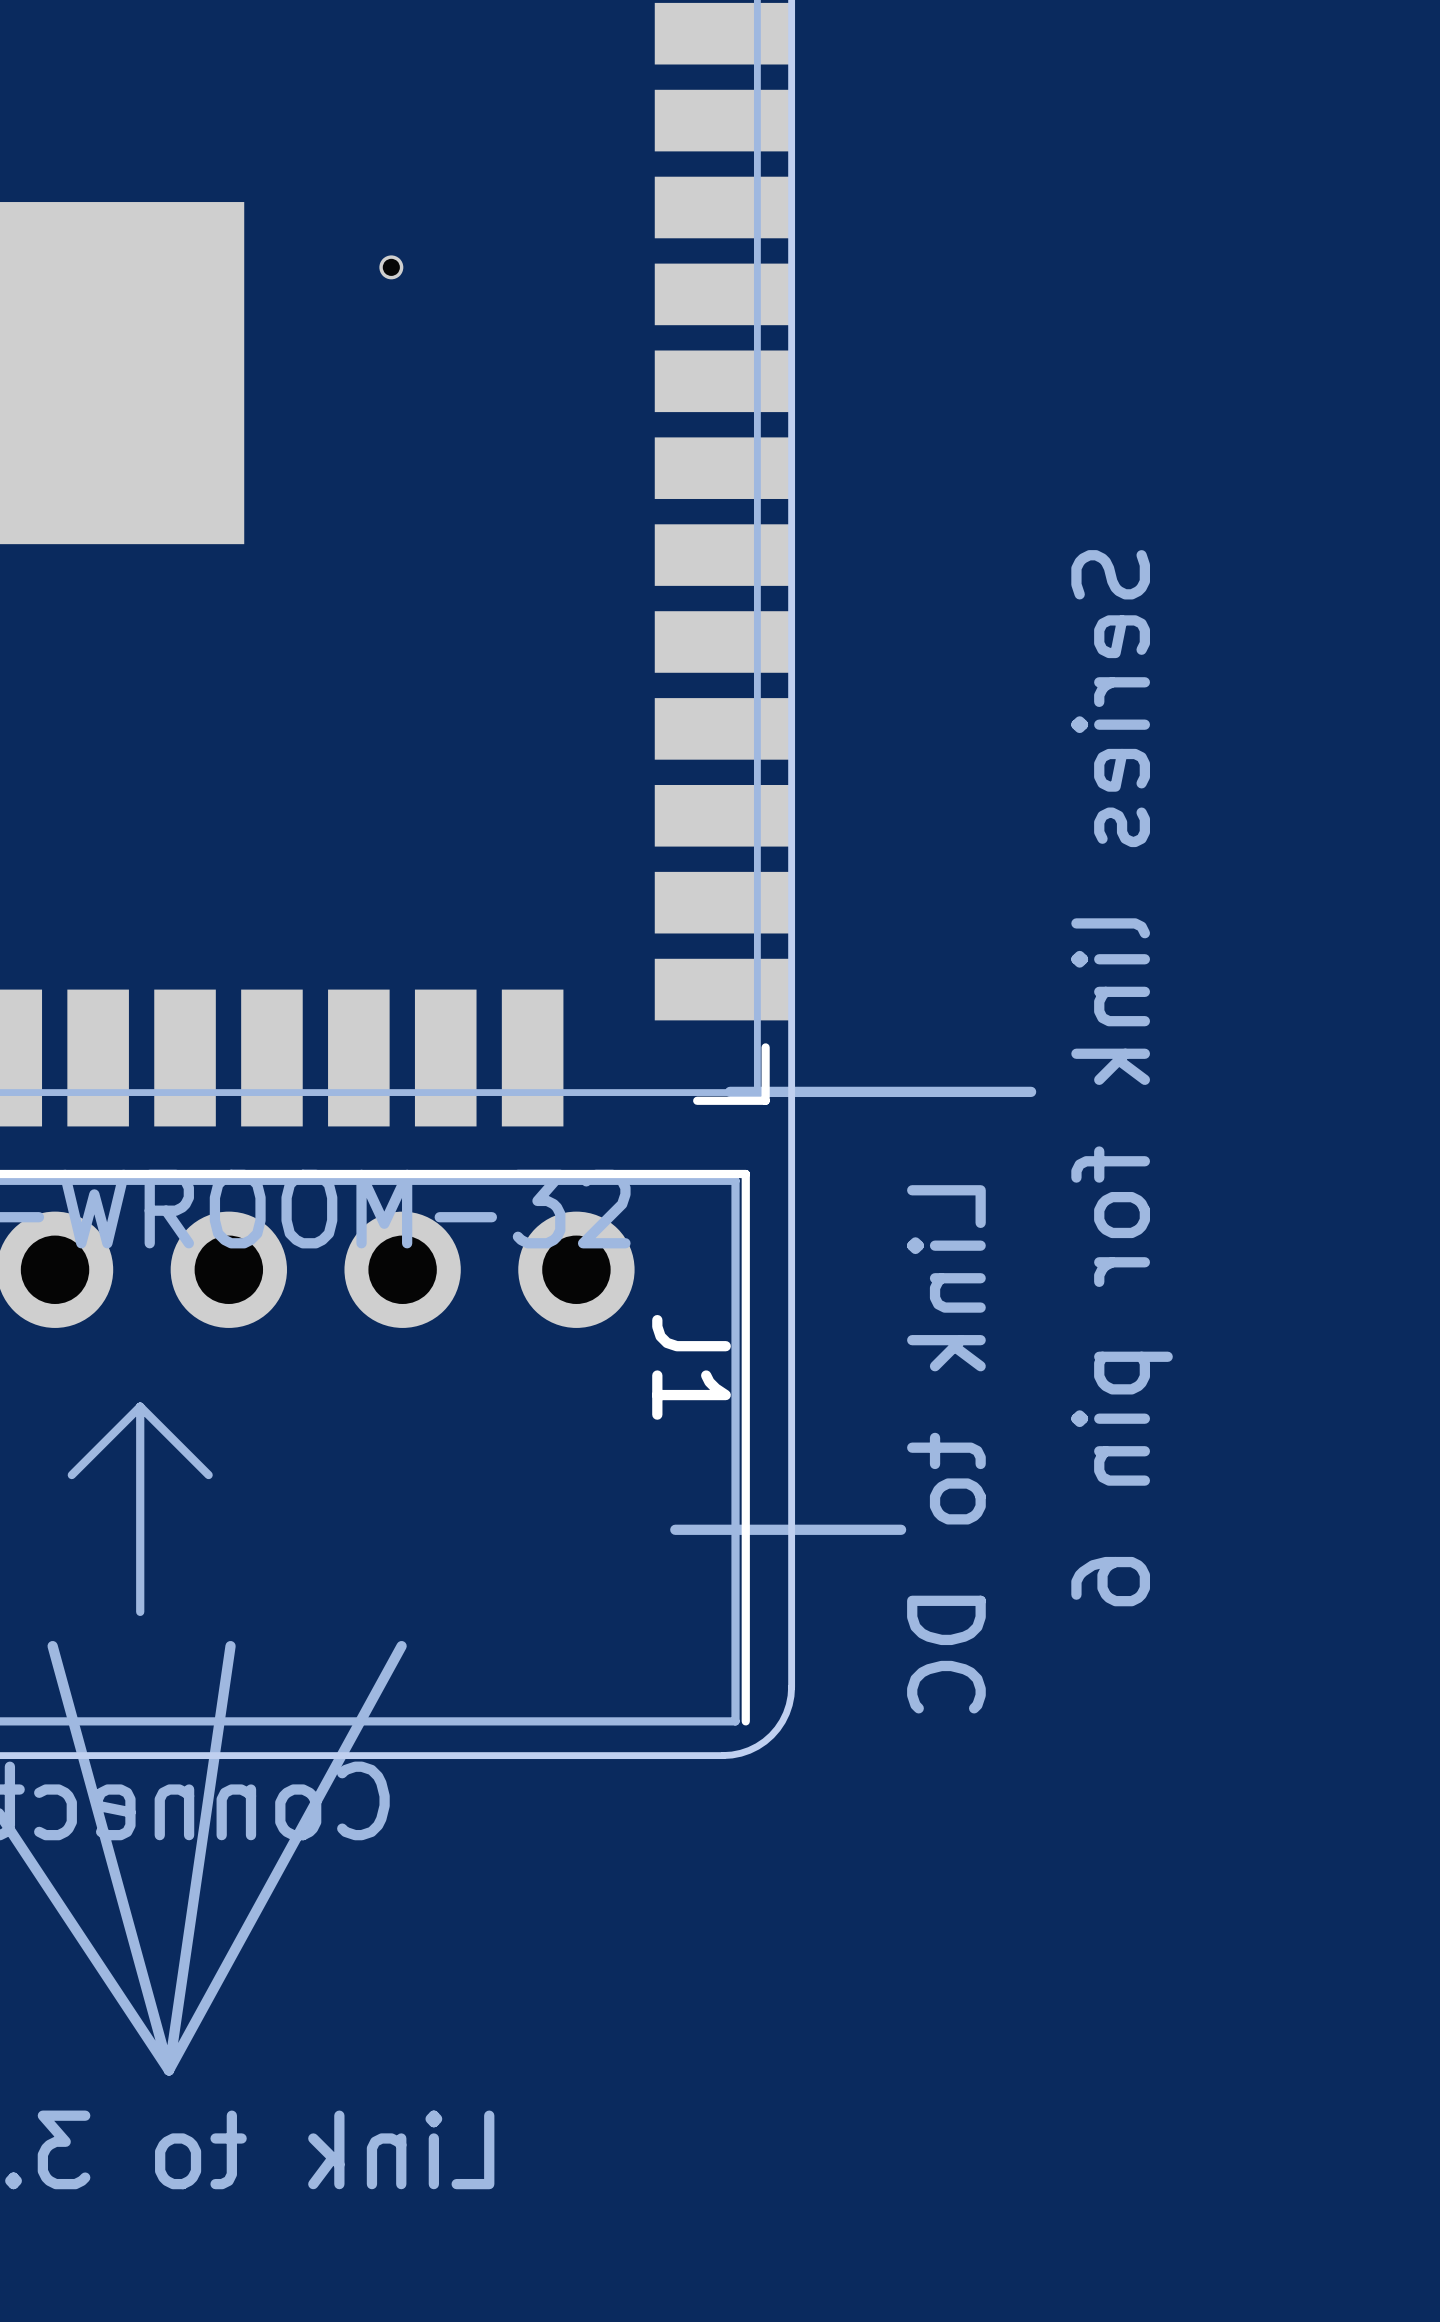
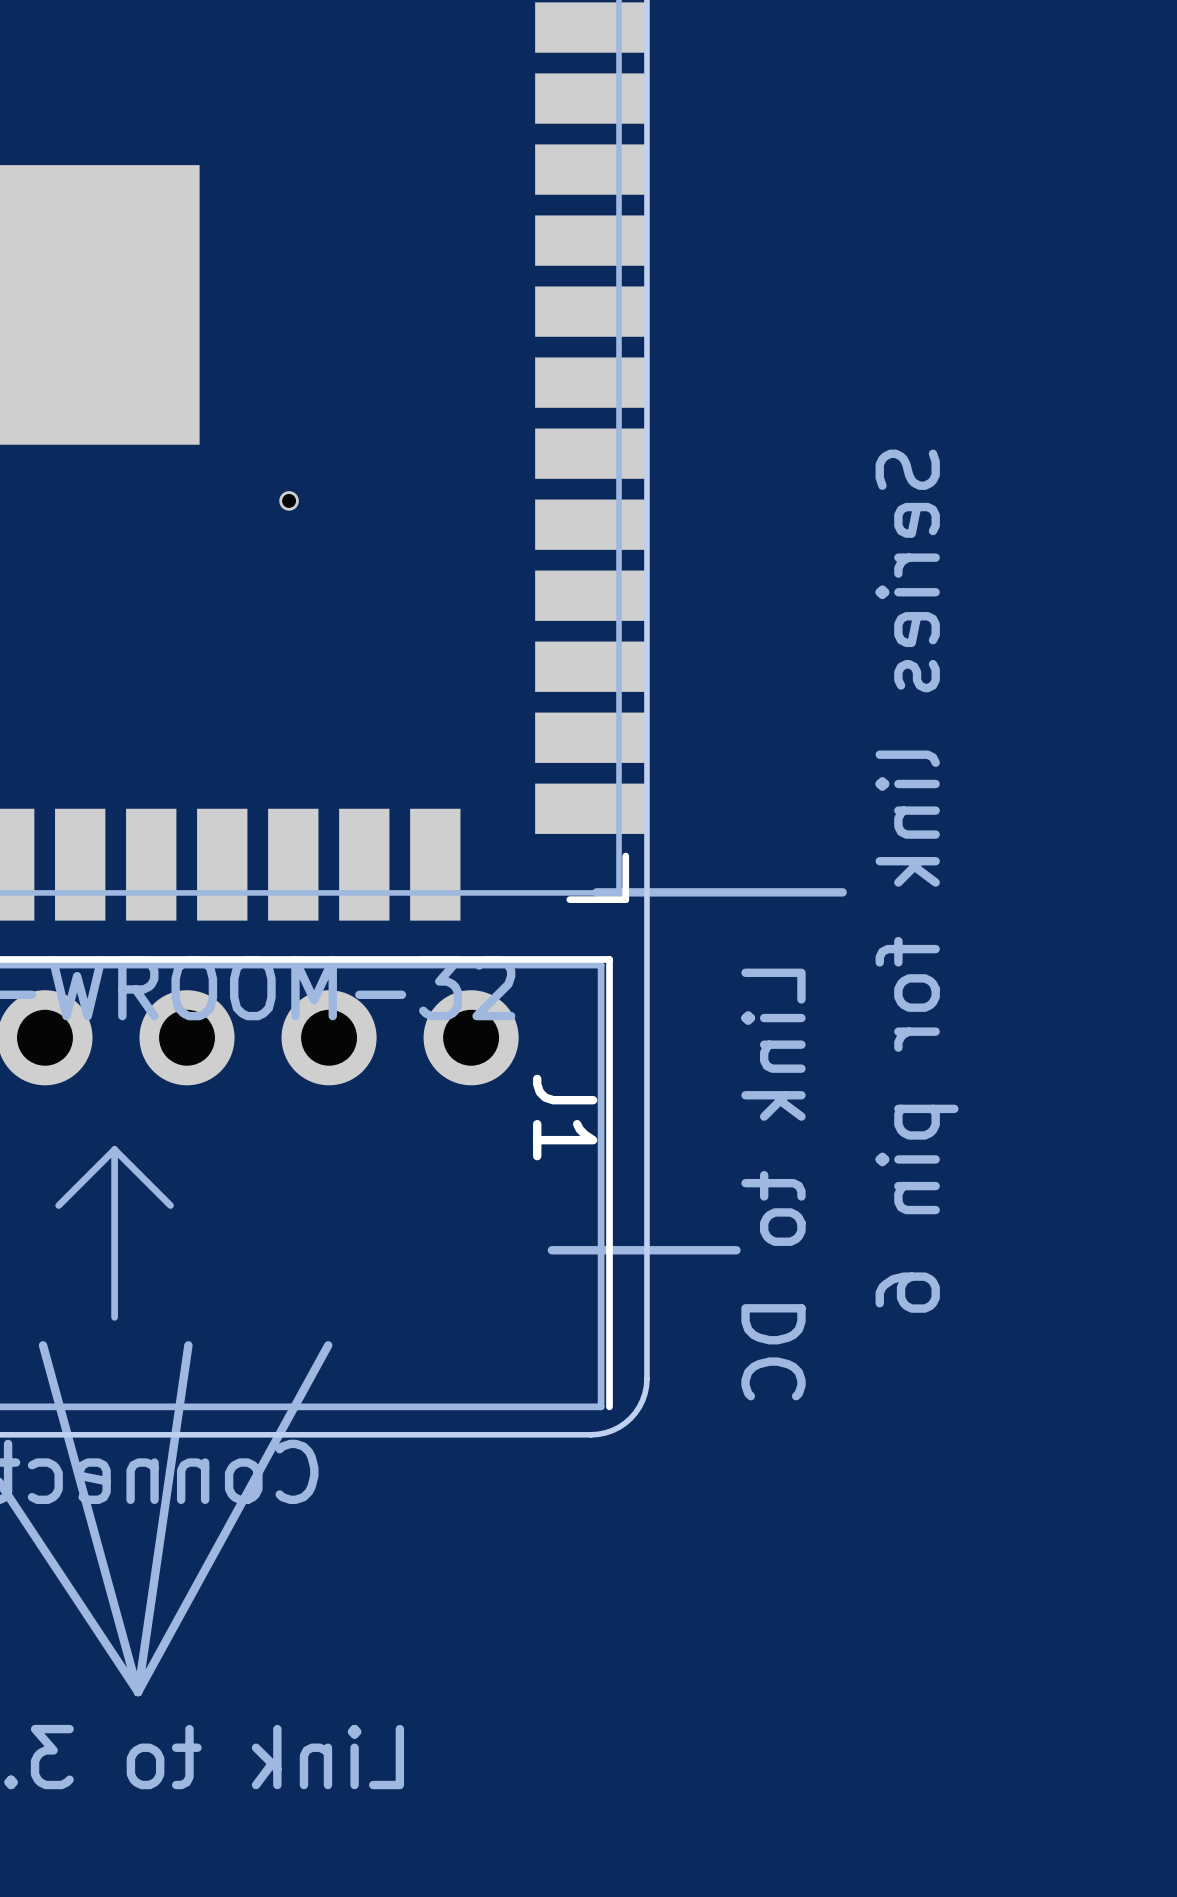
part position: (391, 267) -> (289, 500)

